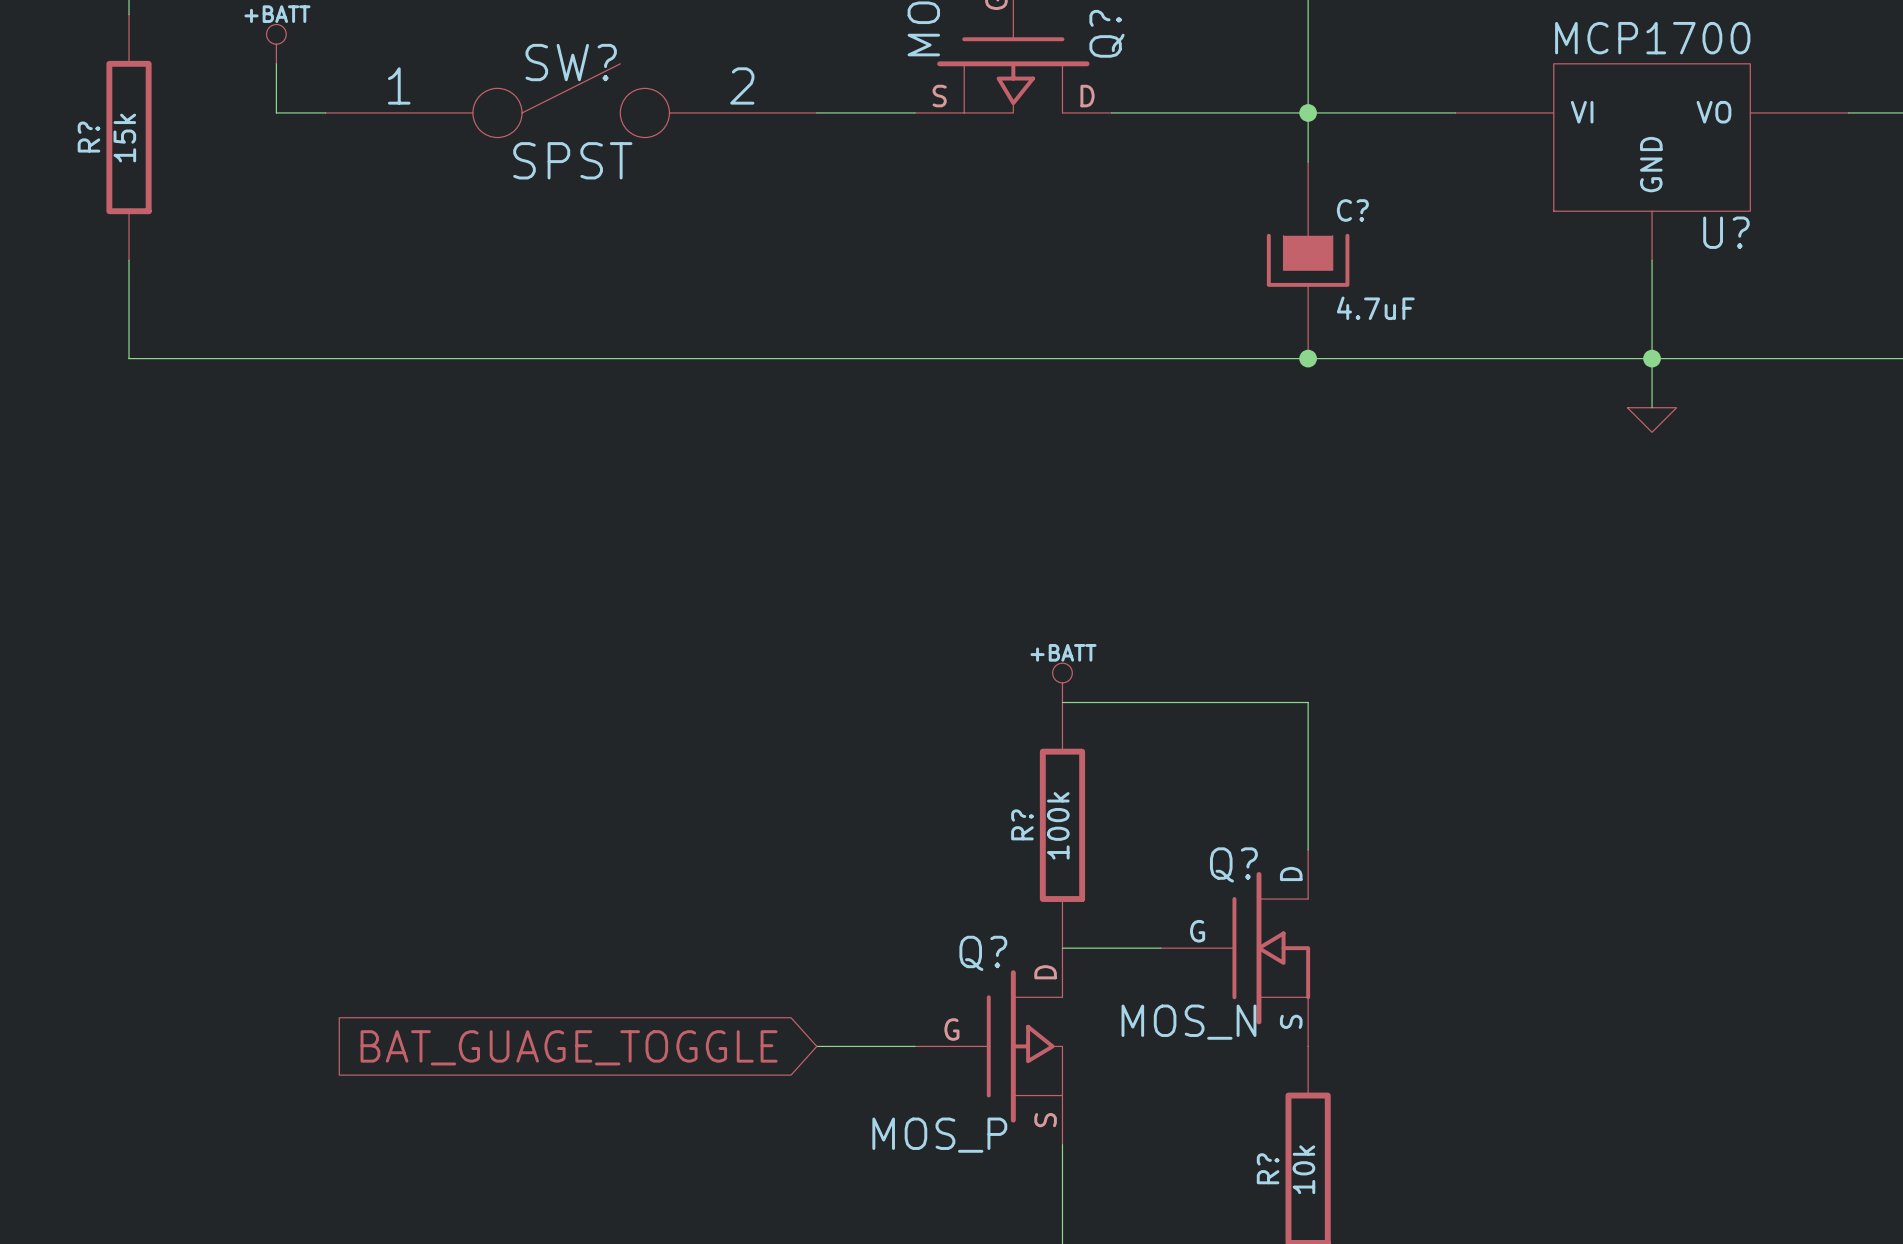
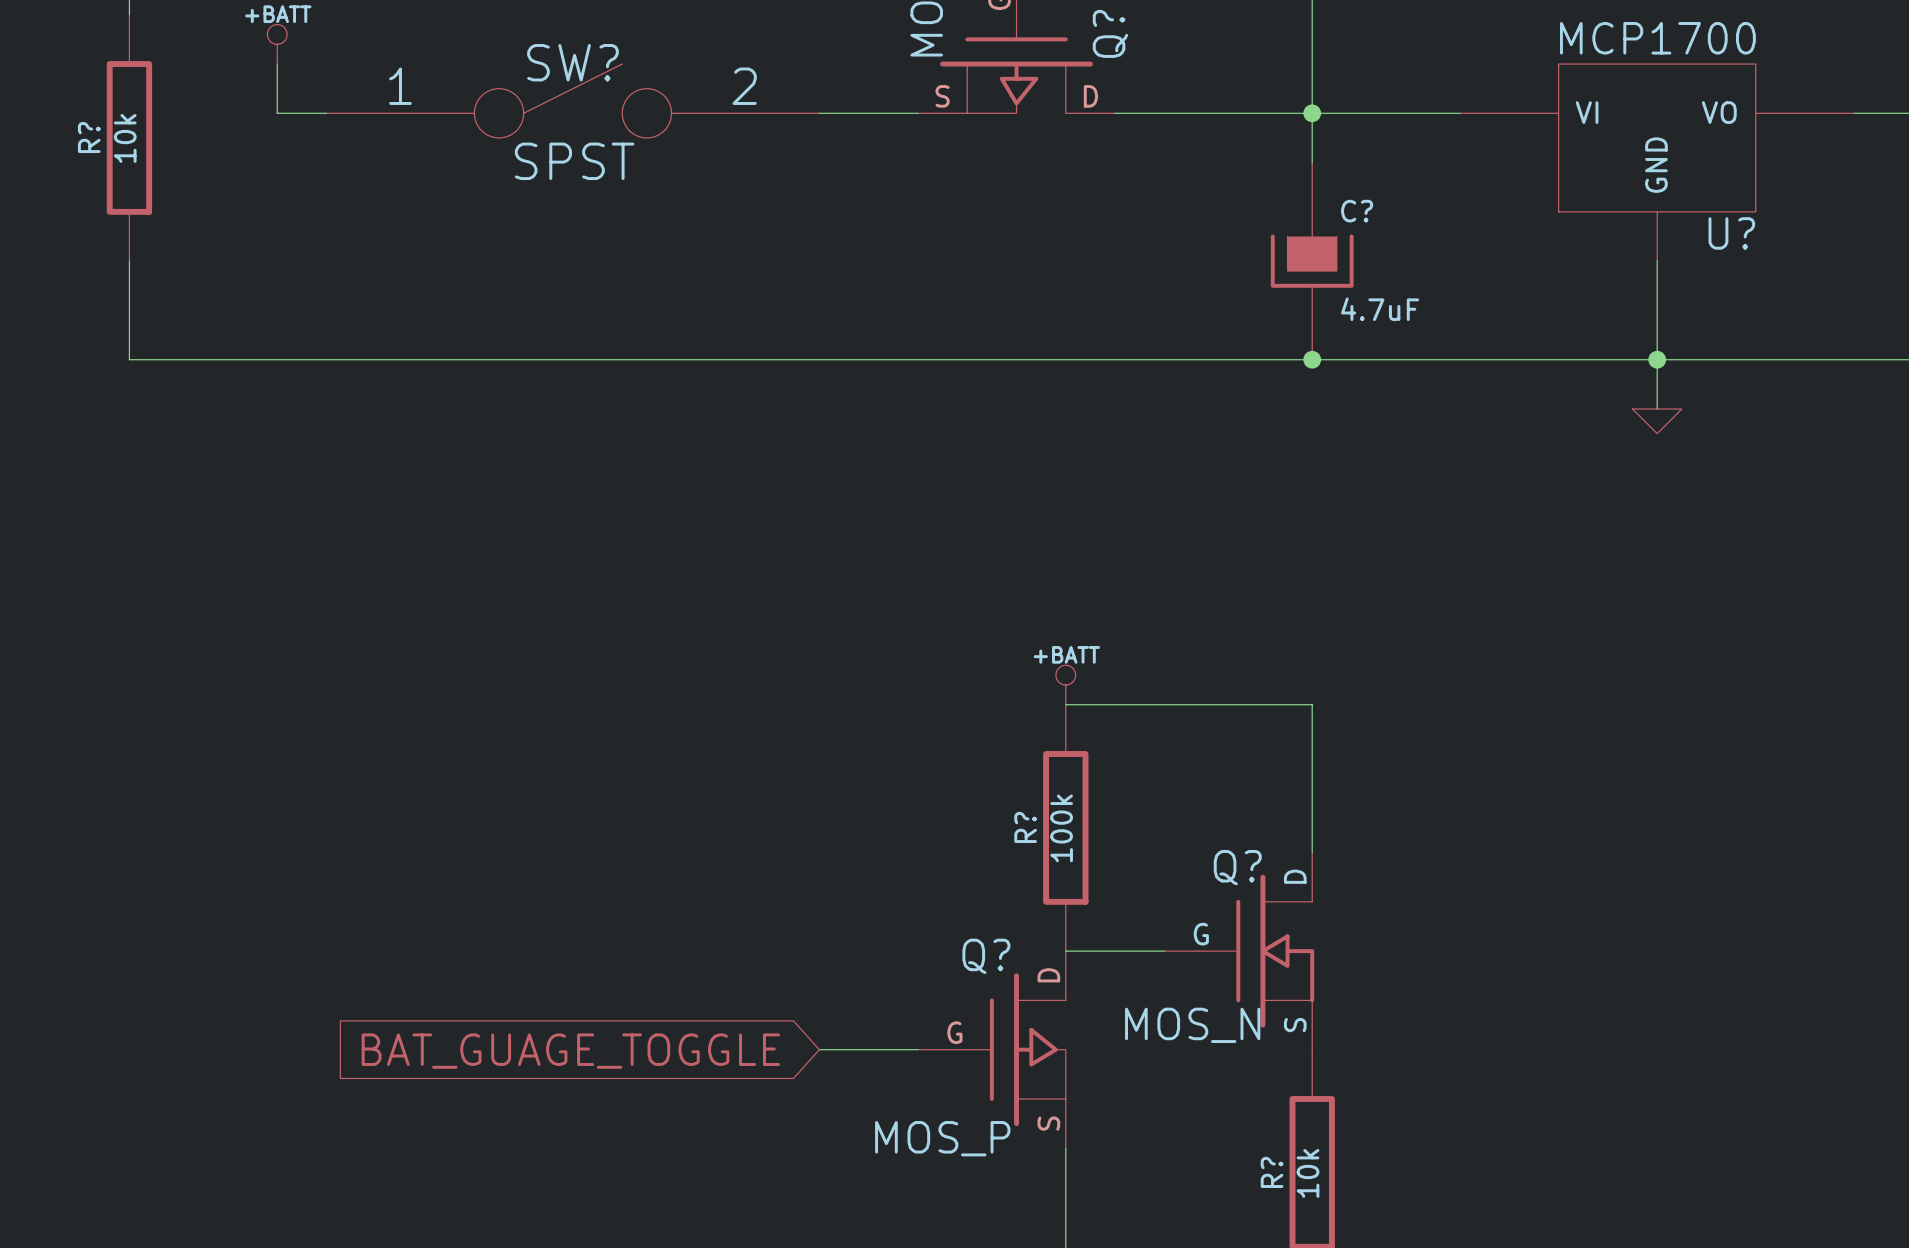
R? value: 15k (124, 138) -> 10k (125, 138)

